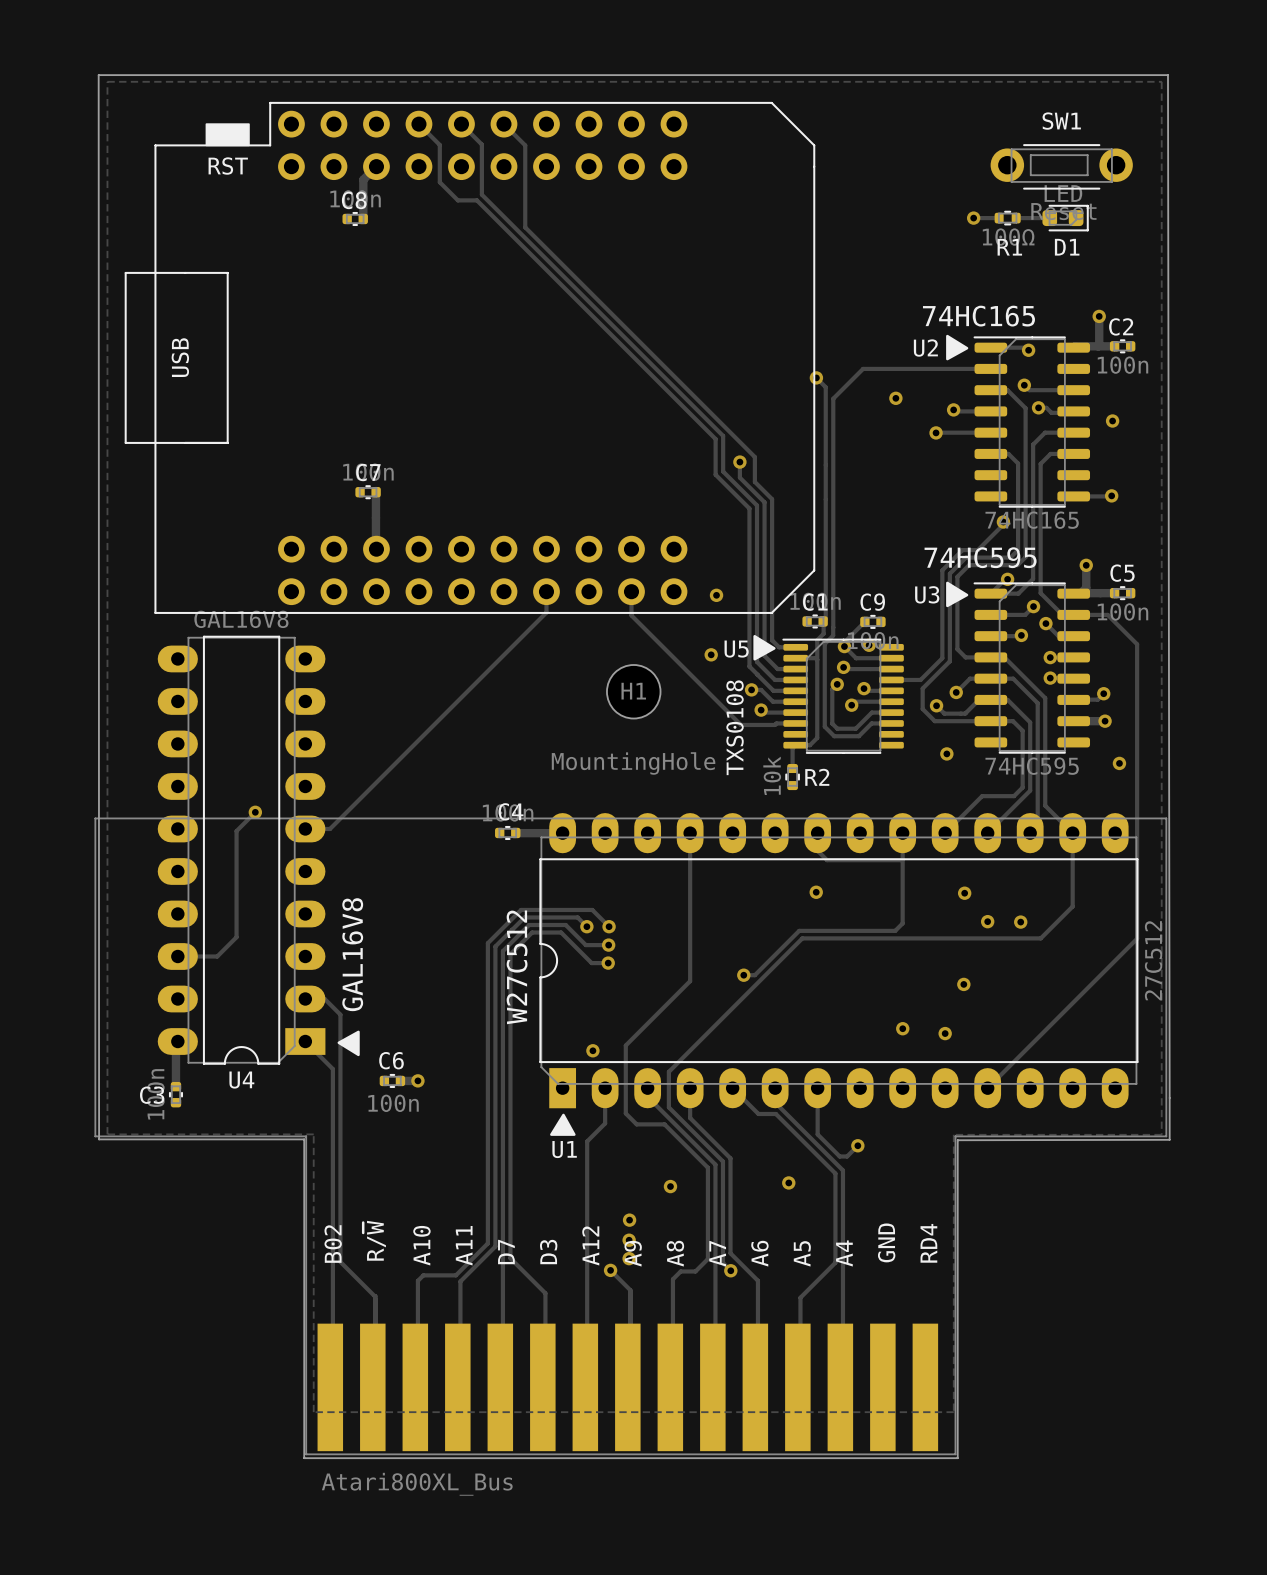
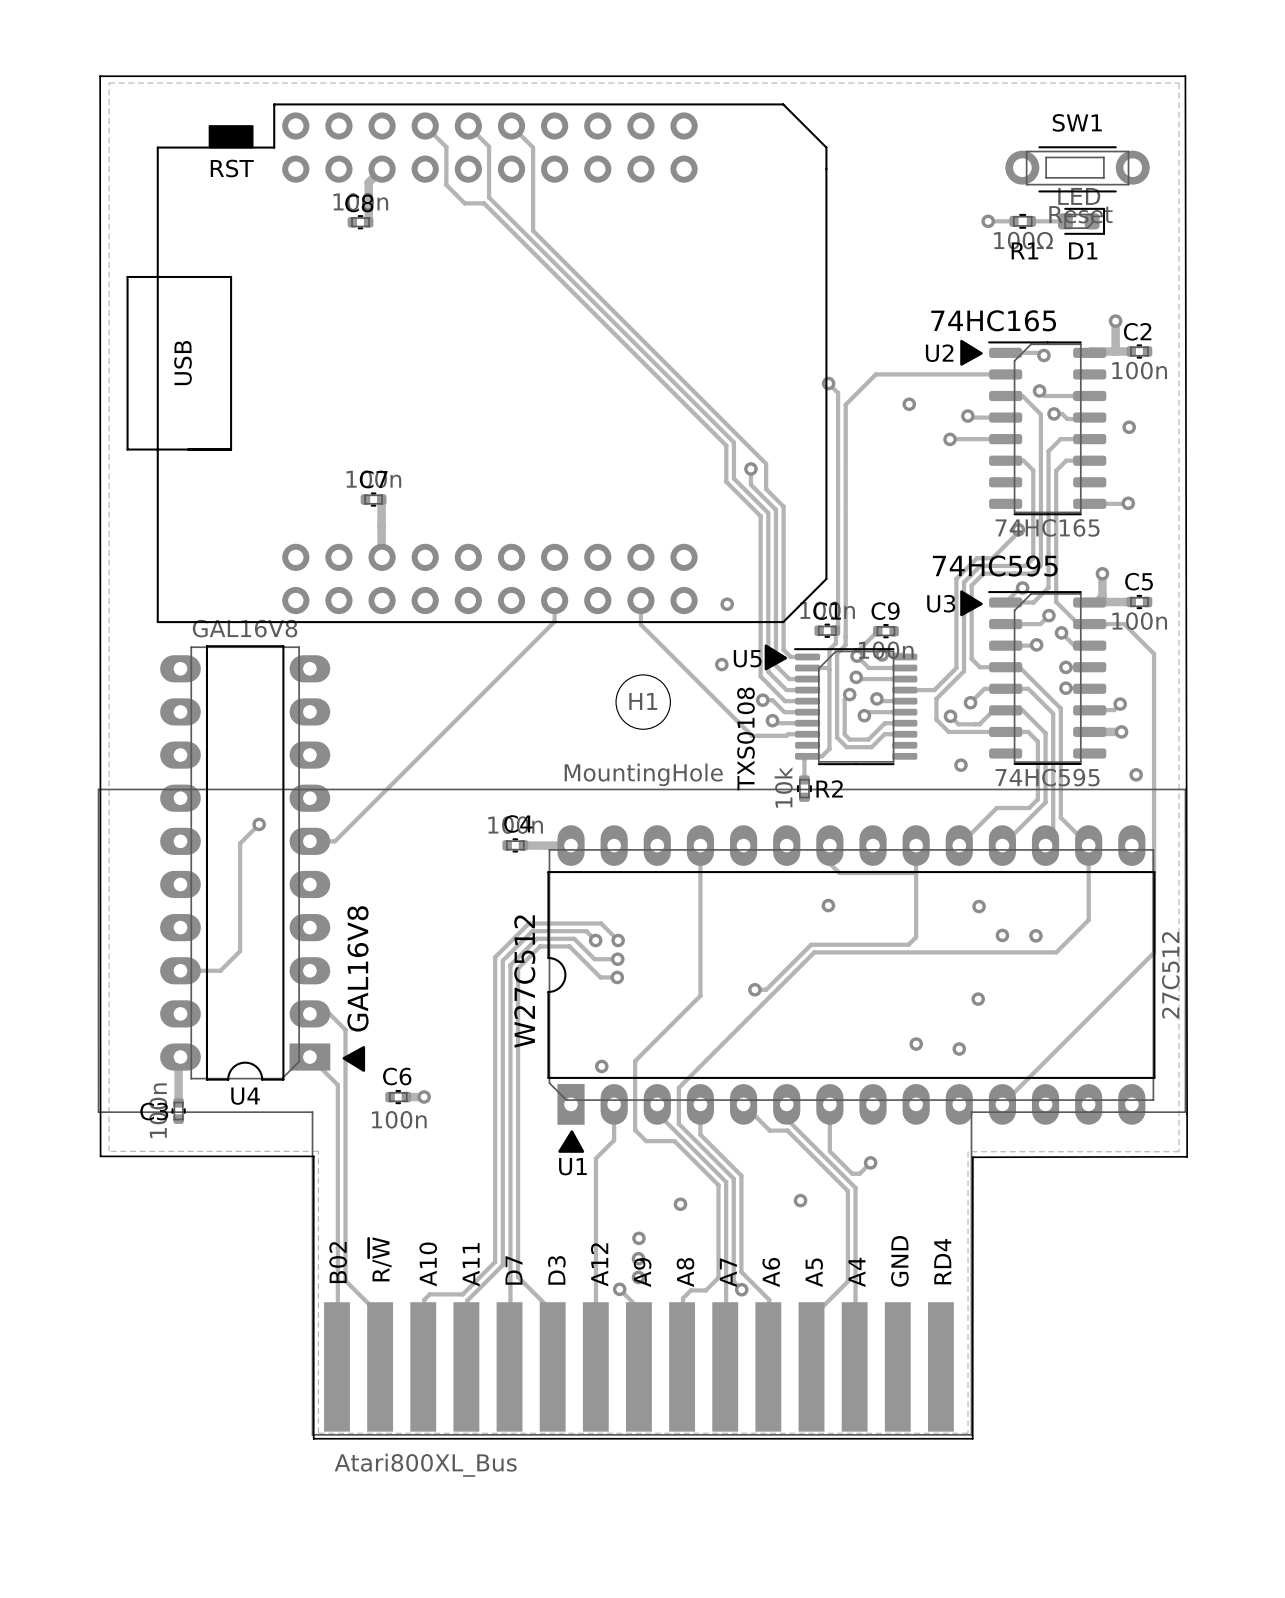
part position: (630, 1136) -> (642, 1112)
board edge: (99, 1139) (304, 1139) (304, 1458) (957, 1458) (958, 1140) -> (100, 1156) (313, 1156) (313, 1438) (972, 1438) (972, 1157)

